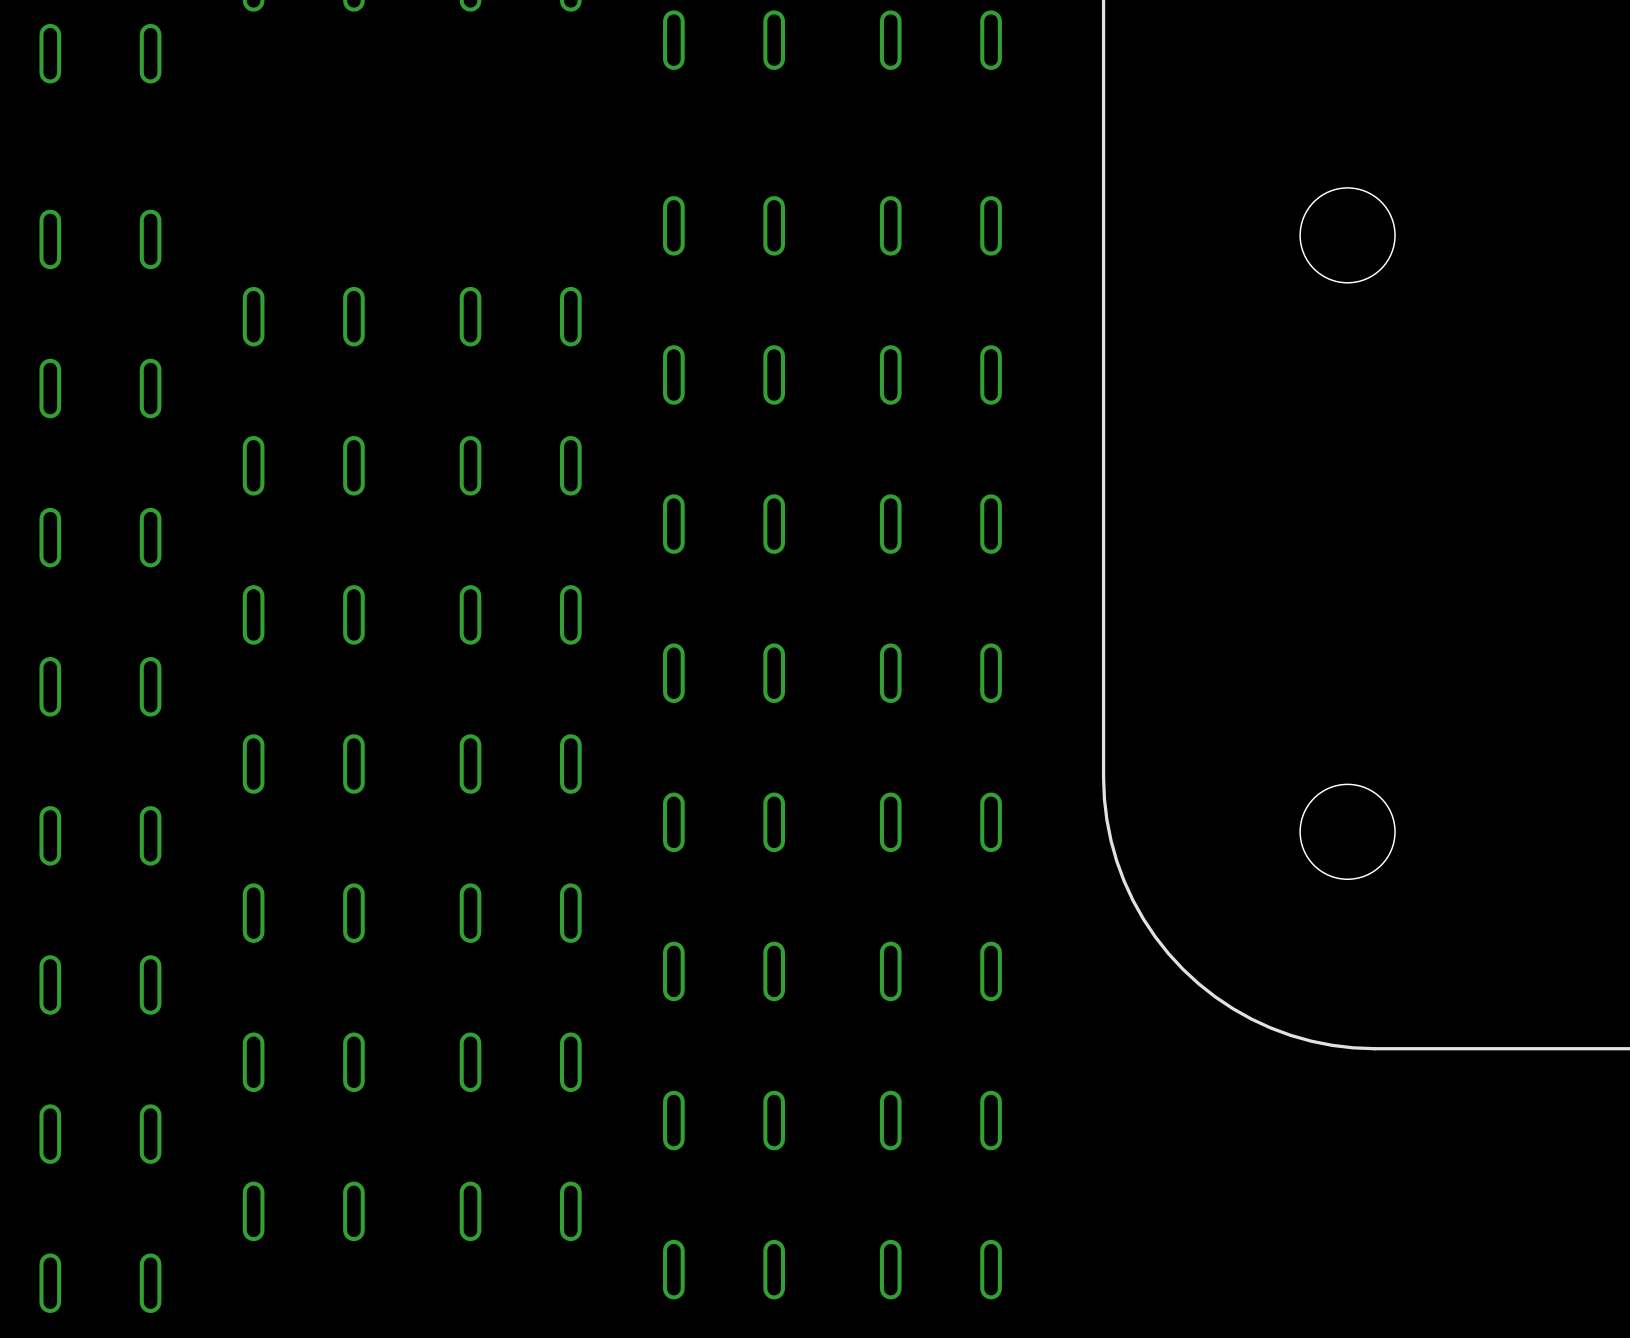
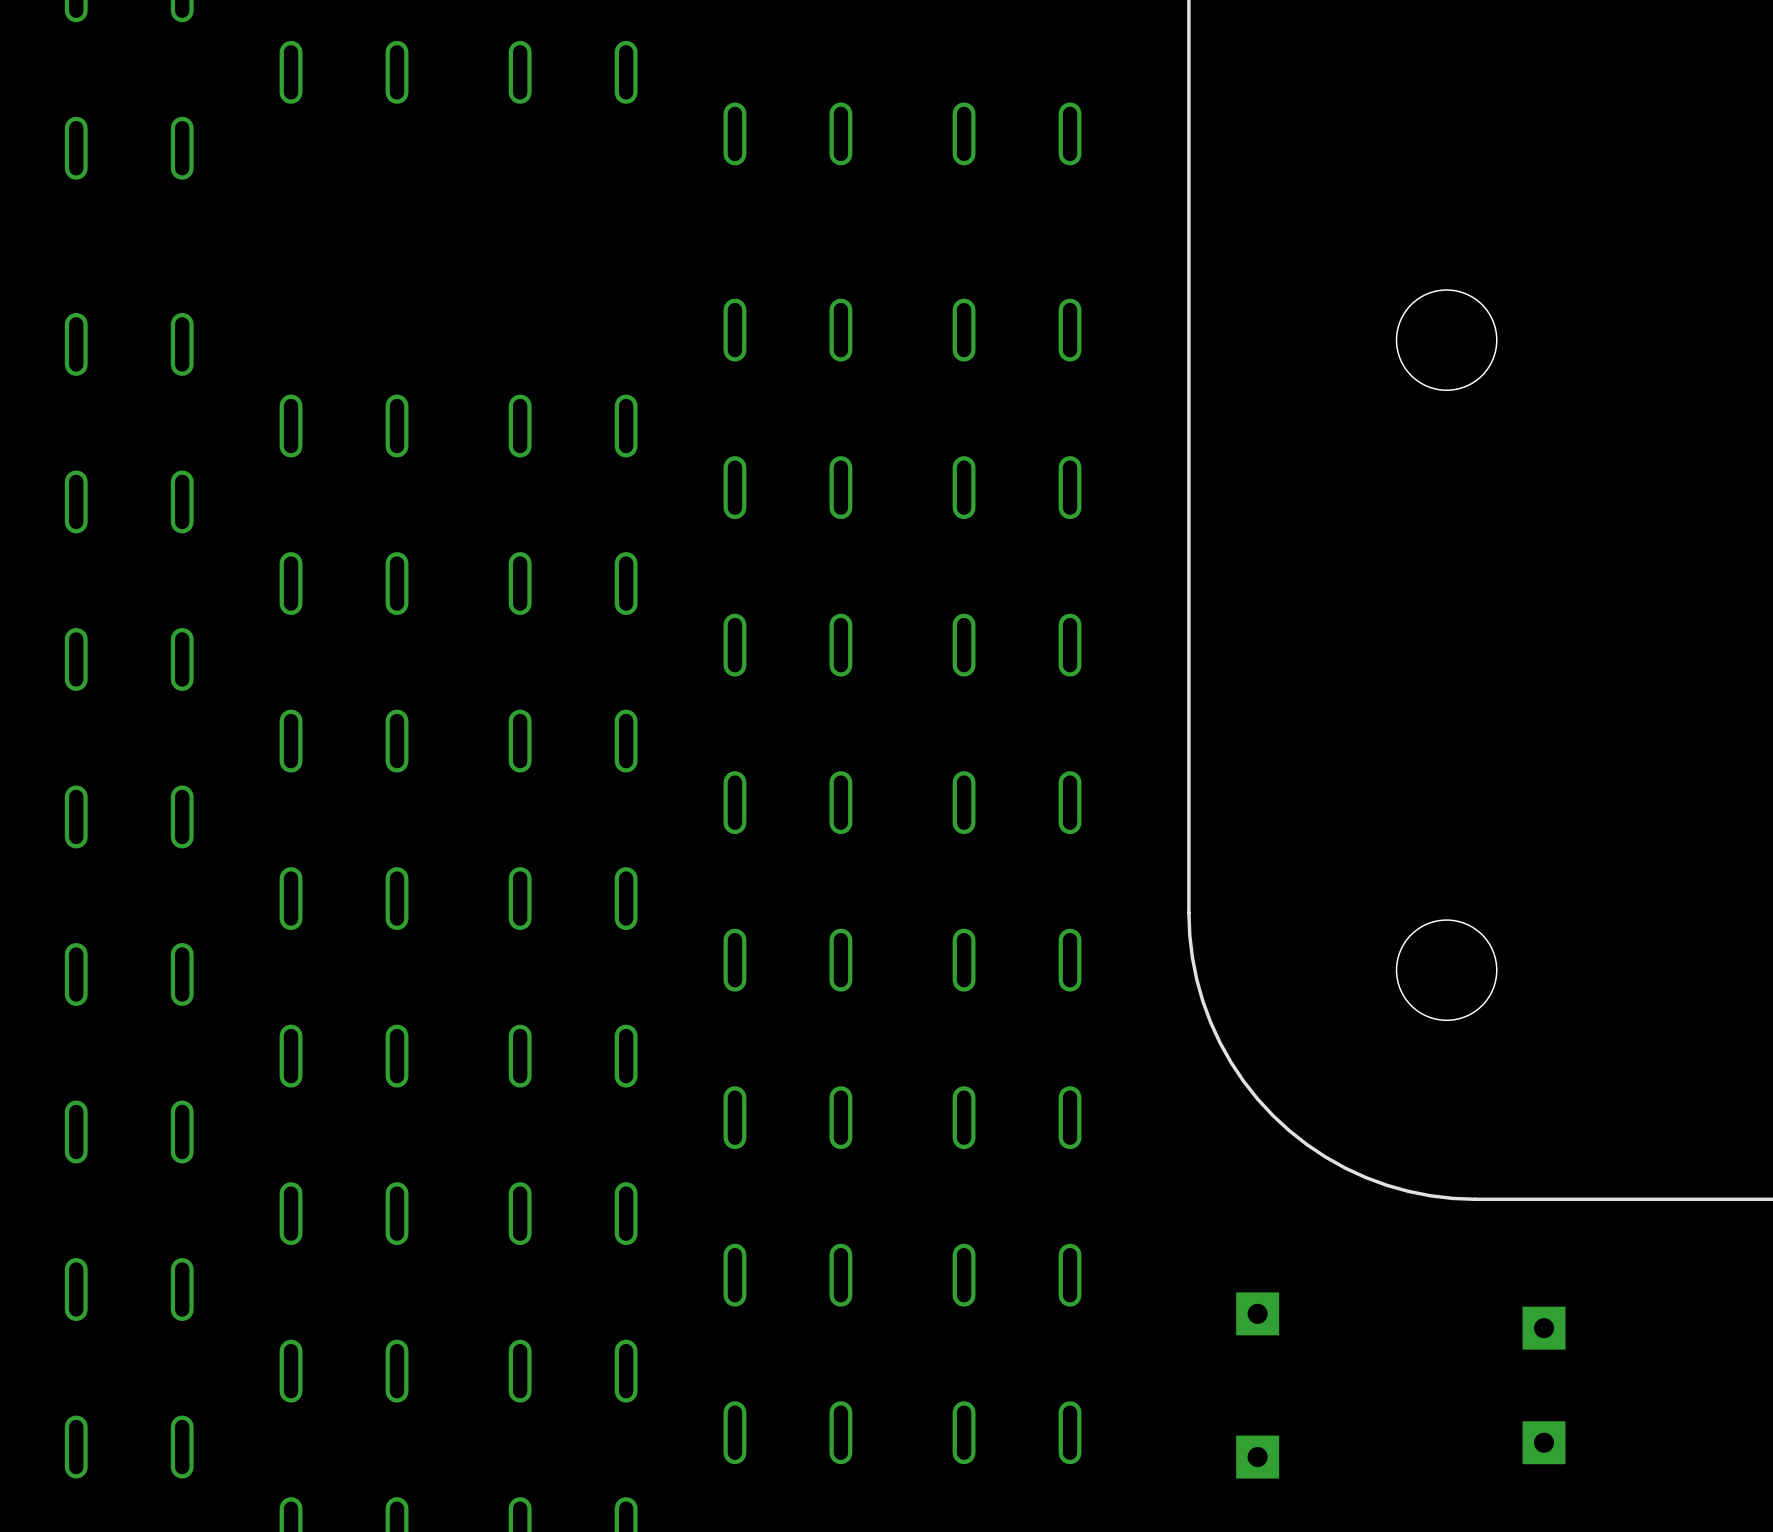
part: none -> (1257, 1313)
part: none -> (1544, 1328)
part: none -> (1544, 1442)
part: none -> (1257, 1457)

